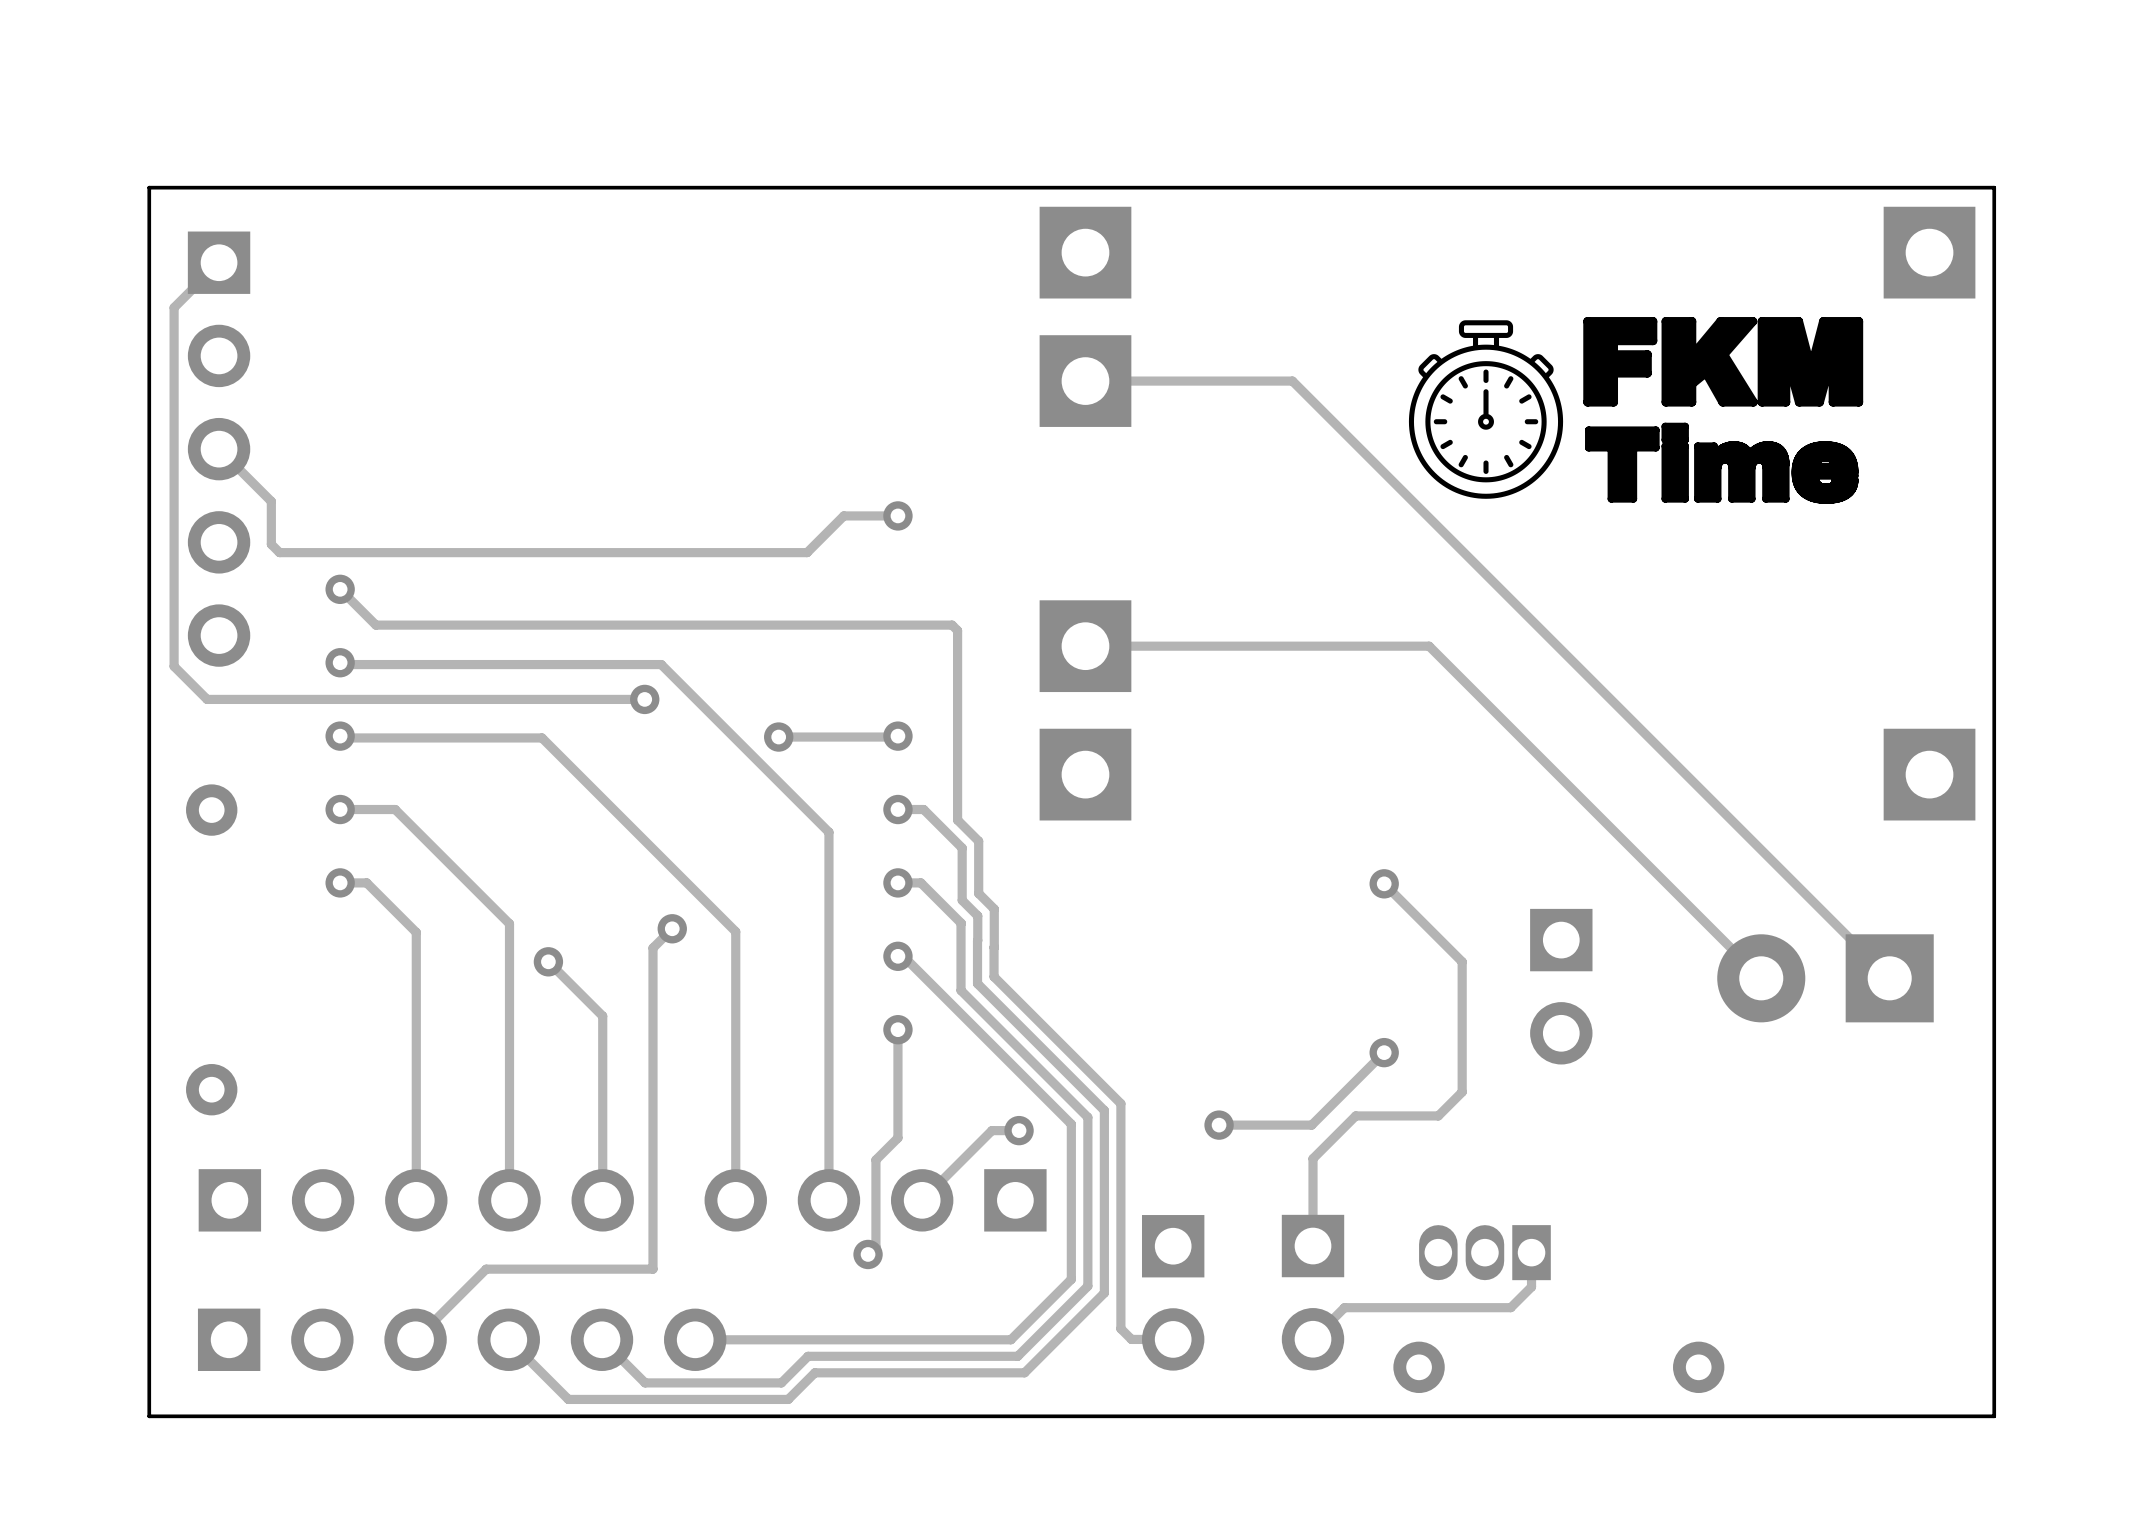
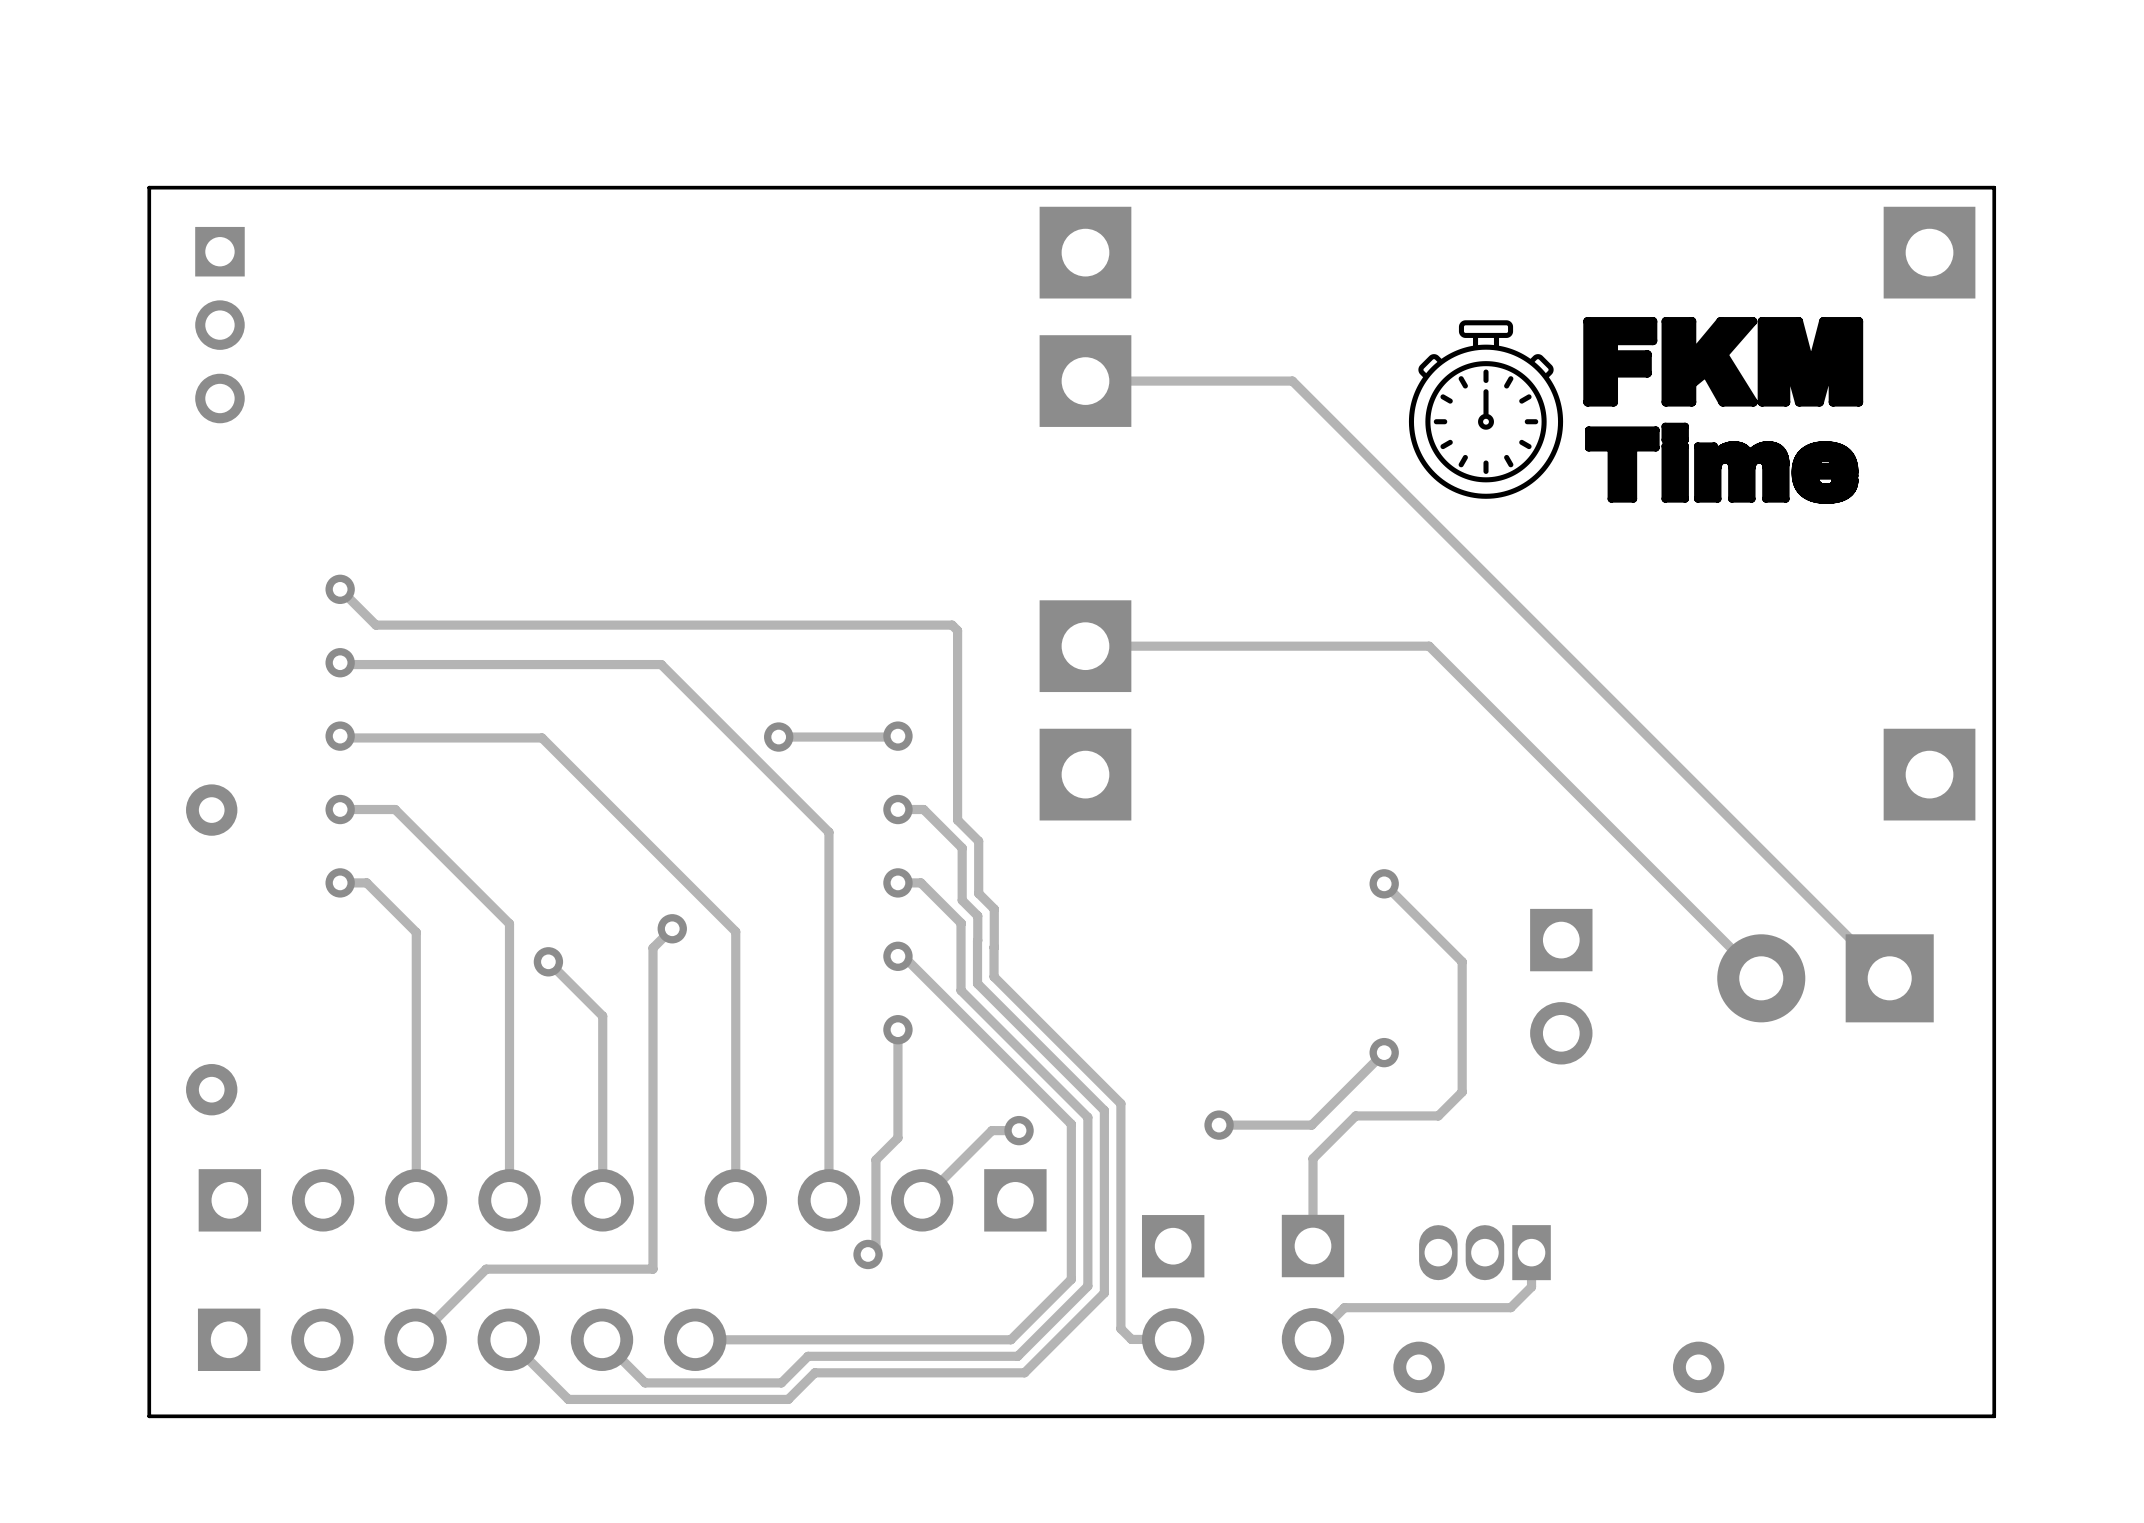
track: (219, 262) (174, 307) (174, 666) (207, 699) (644, 699) -> none
part: none -> (219, 325)
track: (219, 449) (271, 501) (271, 544) (279, 552) (807, 552) (843, 515) (897, 515) -> none
part: (219, 449) -> none
via: (897, 515) -> none
via: (644, 699) -> none

